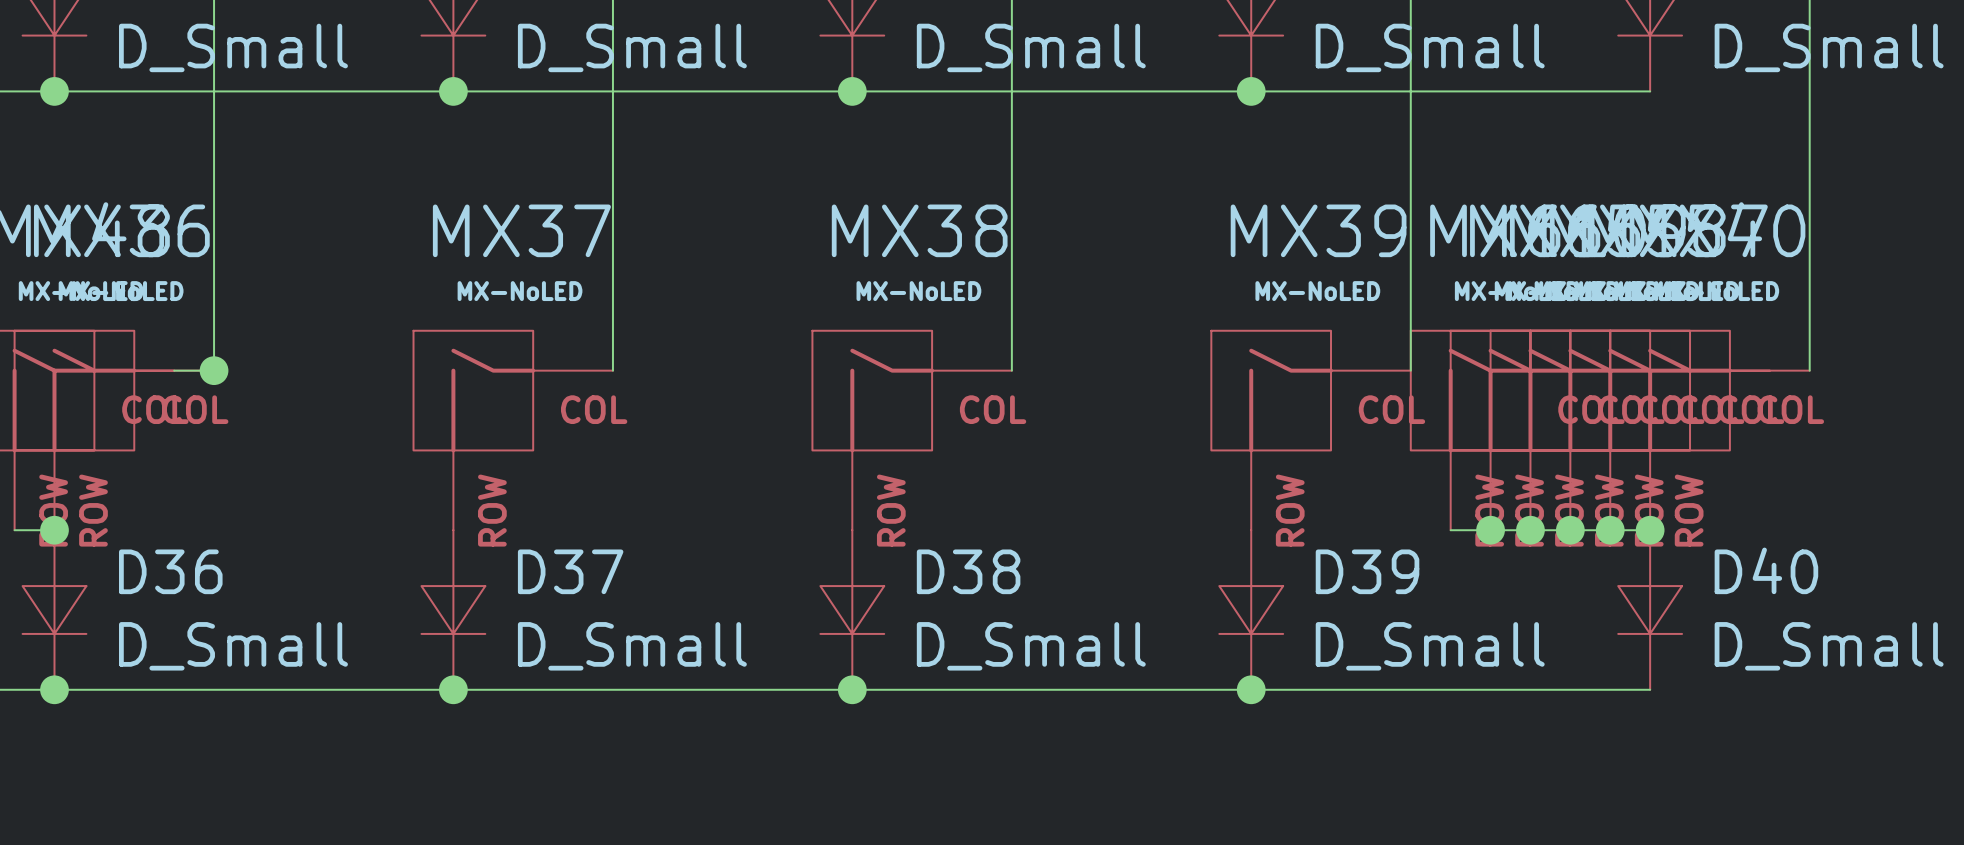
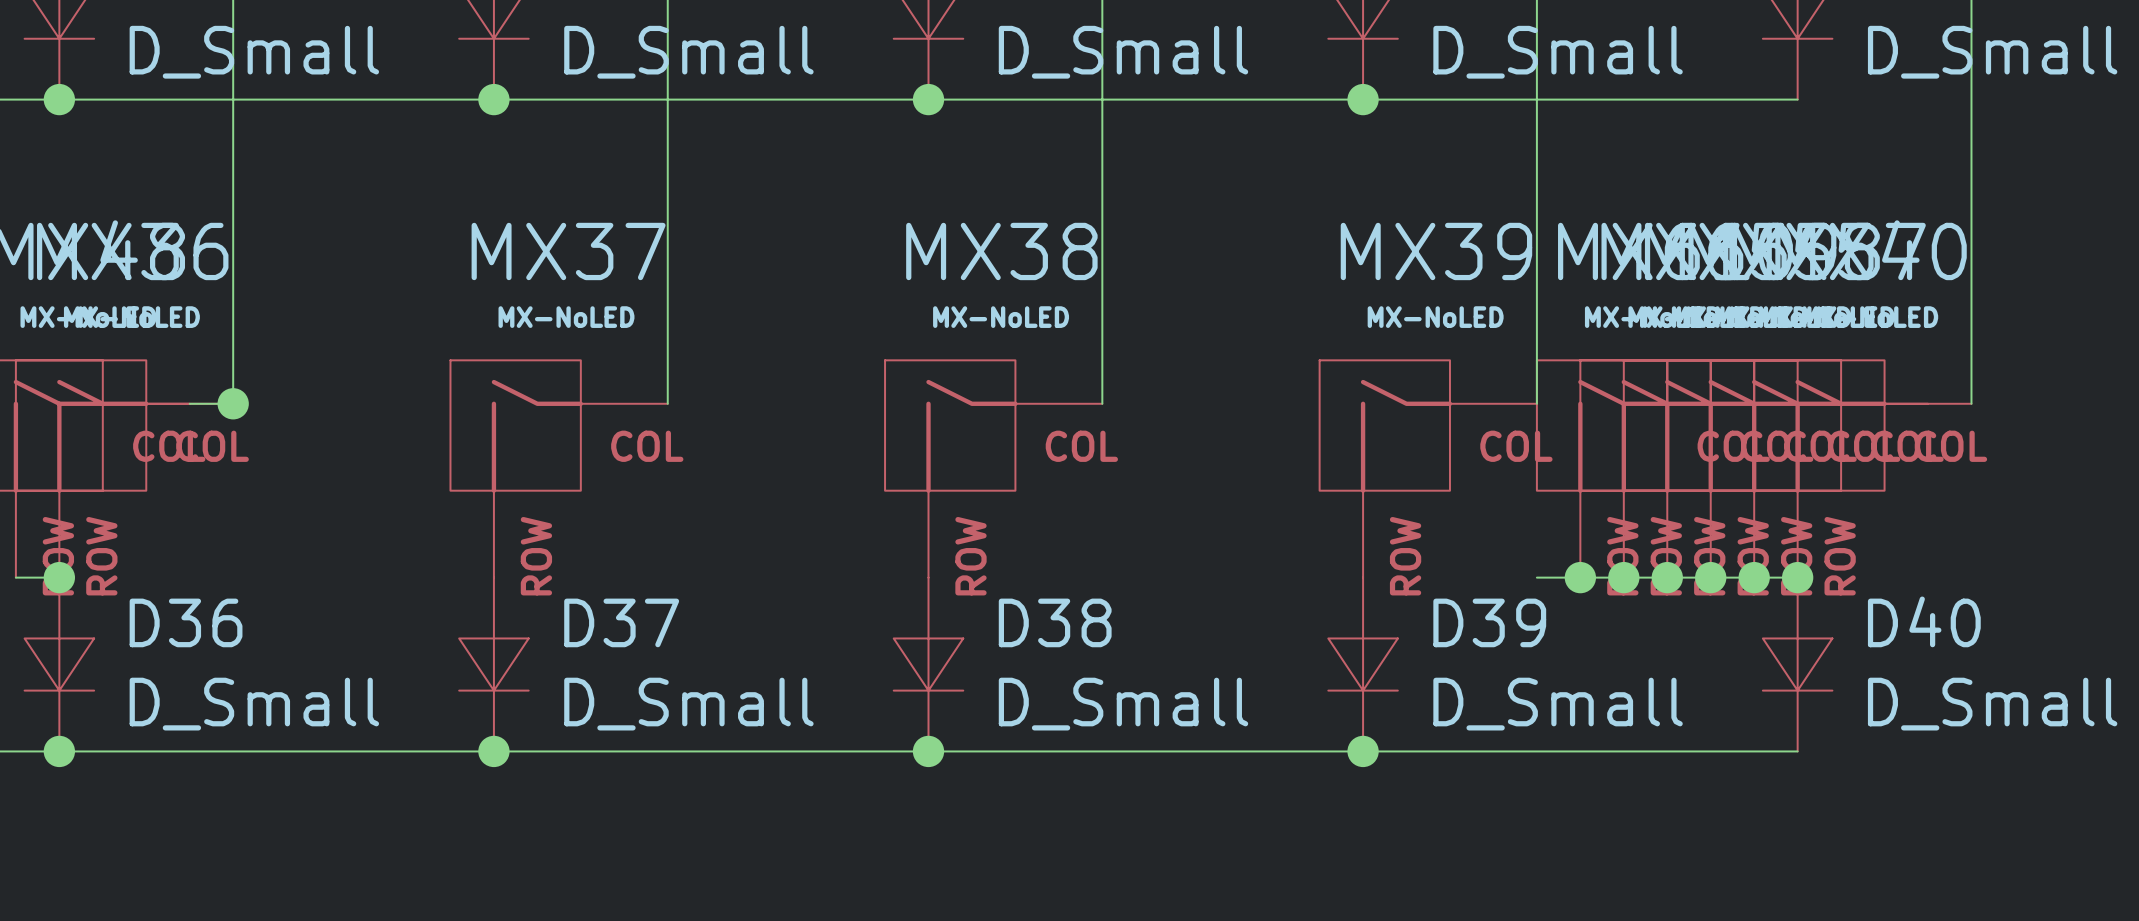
wire: none -> (1536, 577) (1580, 577)
junction: none -> (1580, 577)

